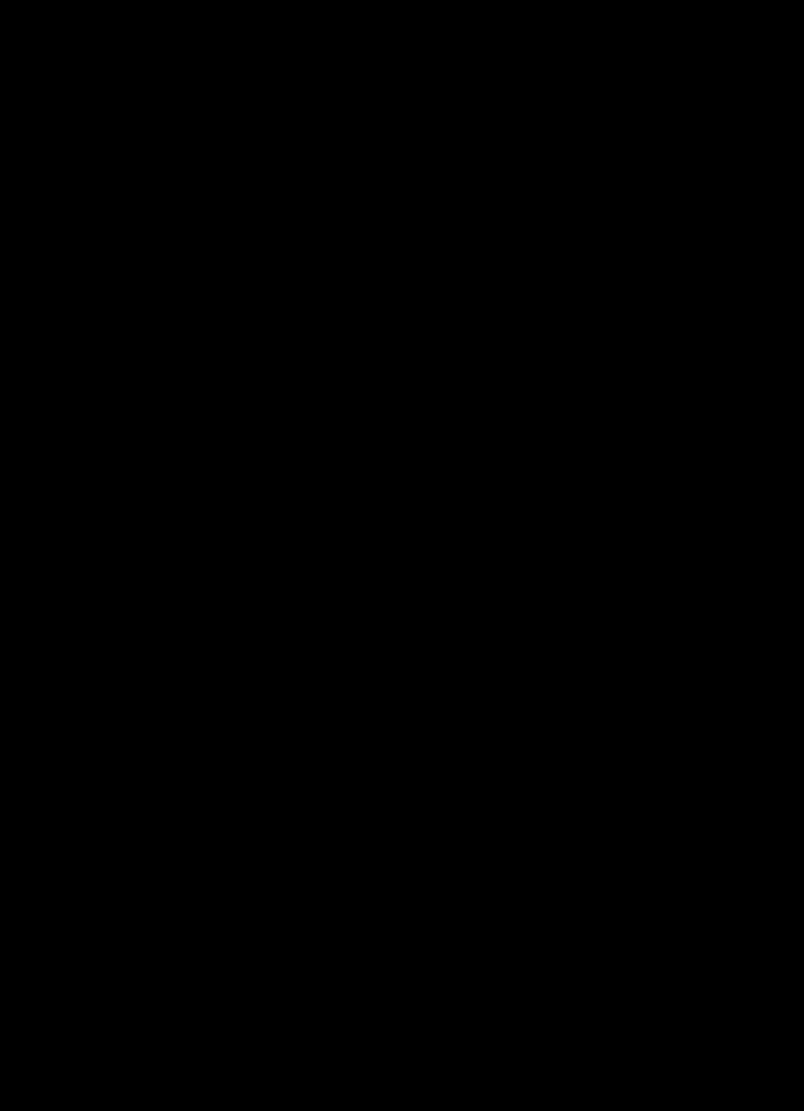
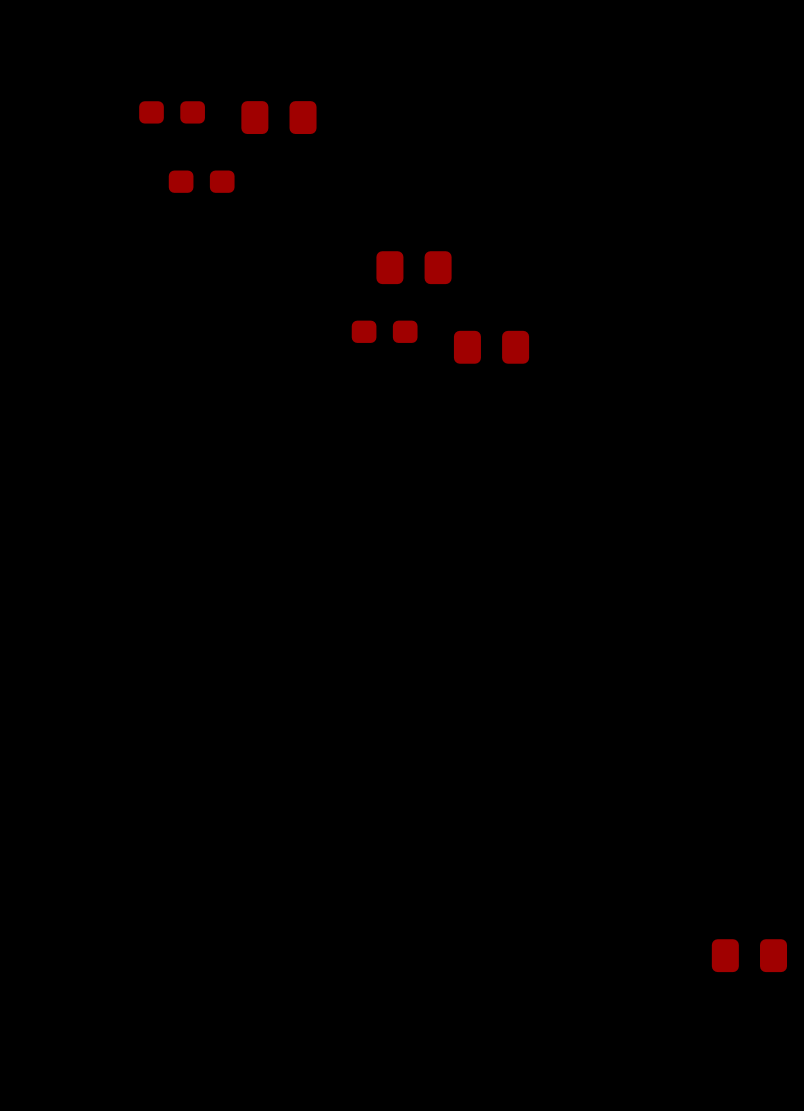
part: none -> (172, 112)
part: none -> (278, 117)
part: none -> (201, 181)
part: none -> (414, 267)
part: none -> (384, 331)
part: none -> (491, 347)
part: none -> (749, 955)

